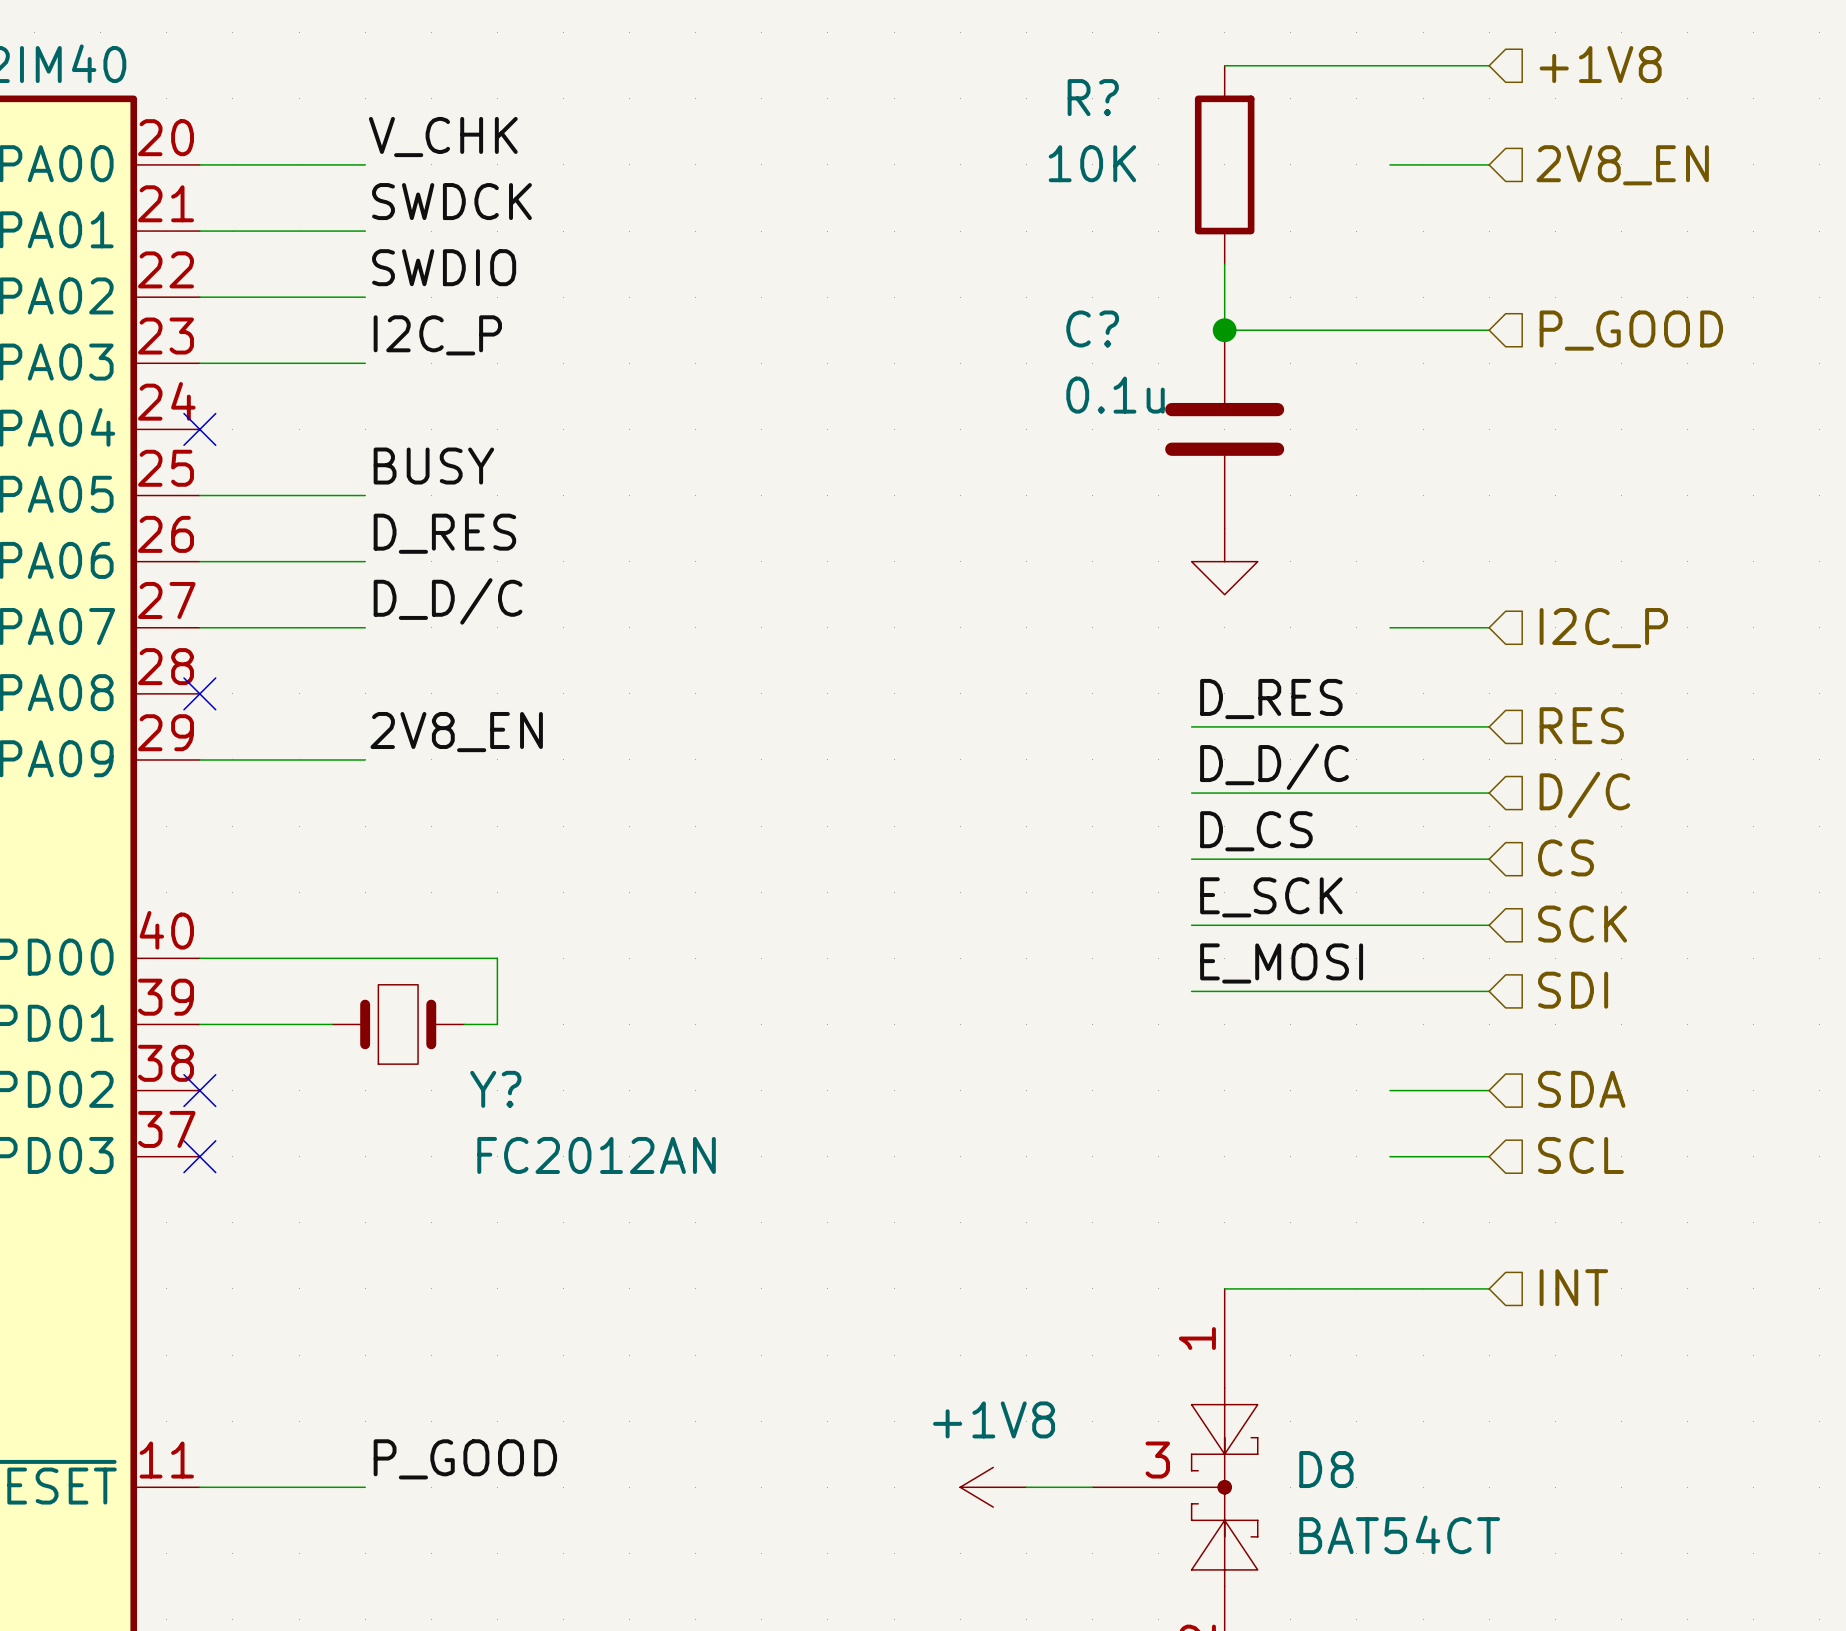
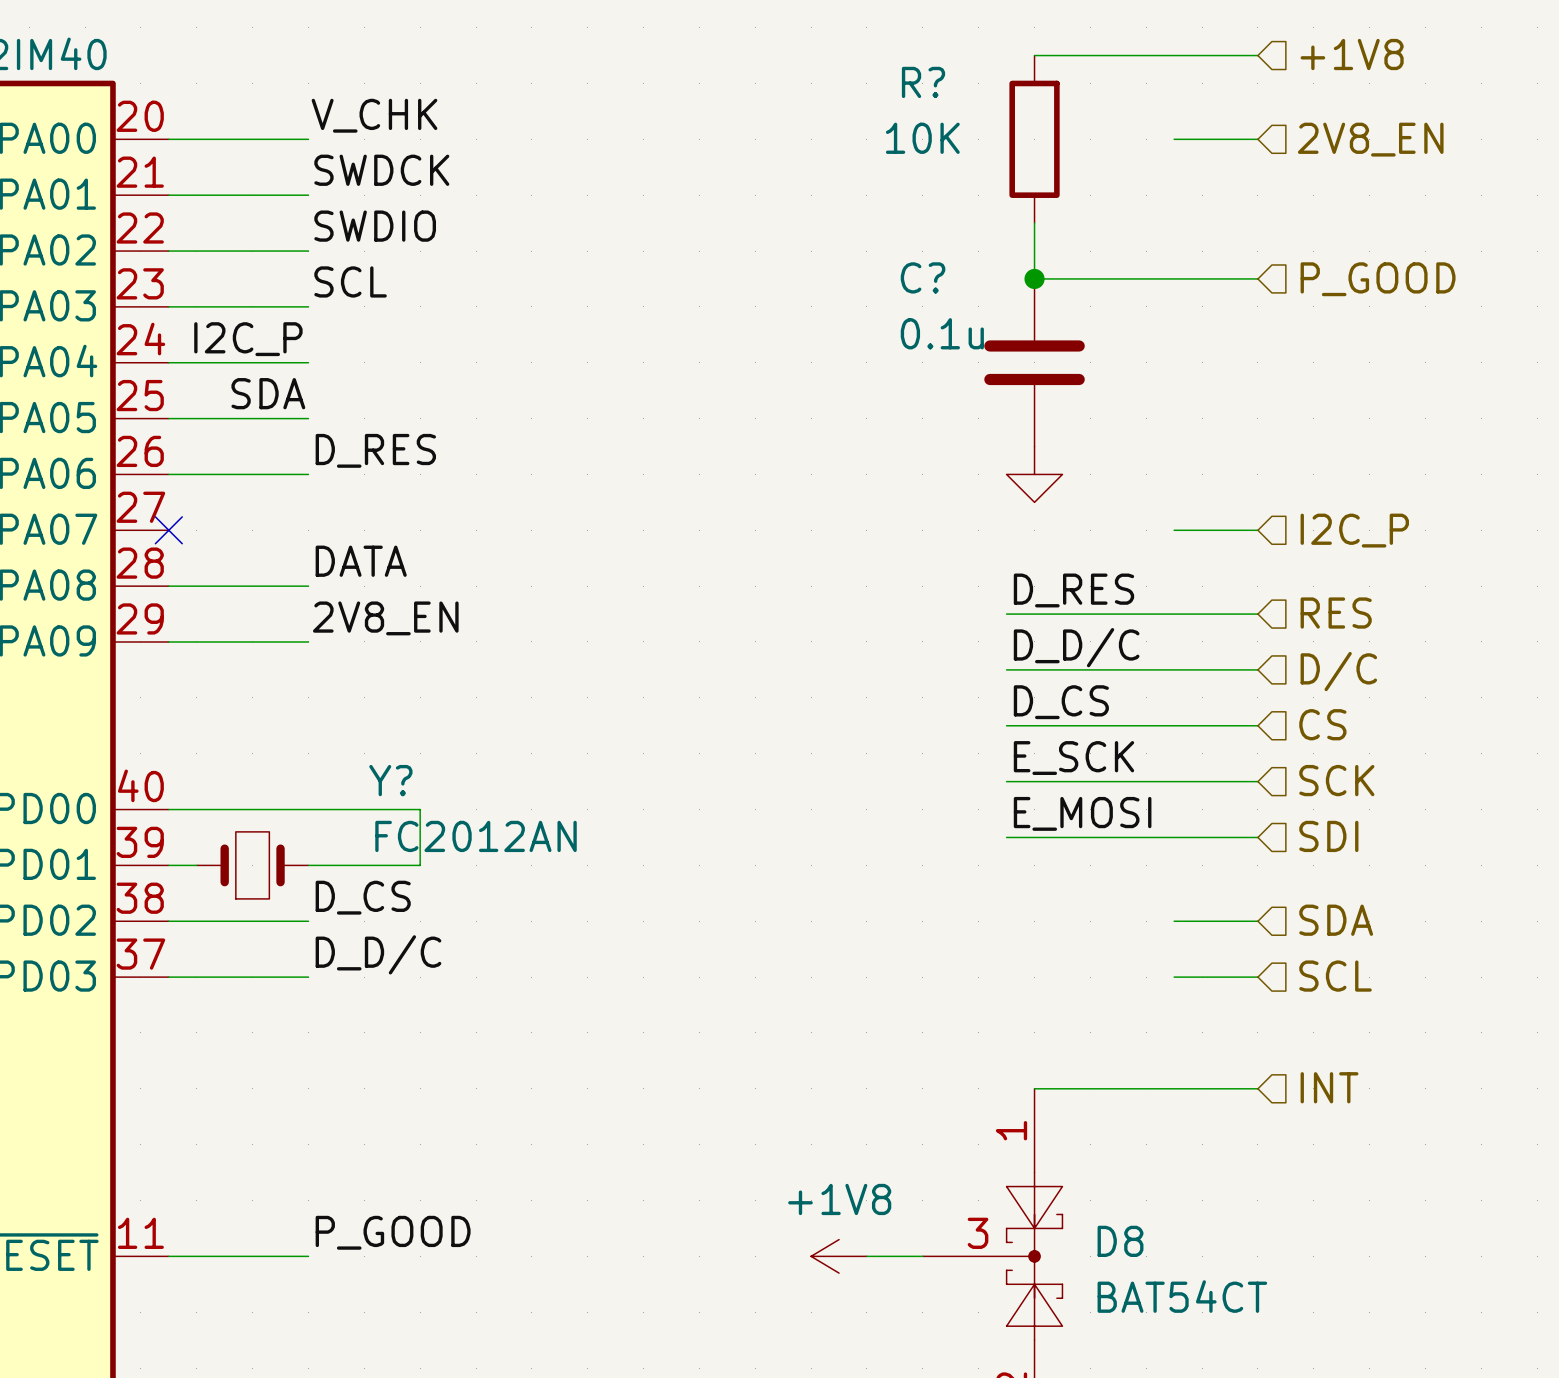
label: I2C_P (437, 335) -> SCL (350, 281)
label: none -> I2C_P (248, 339)
wire: none -> (168, 362) (308, 362)
no-connect mark: (199, 429) -> none
label: BUSY (433, 466) -> SDA (268, 393)
label position: D_D/C (448, 601) -> D_D/C (378, 954)
wire: (199, 627) (365, 627) -> (168, 586) (308, 586)
label: none -> DATA (361, 561)
no-connect mark position: (199, 693) -> (168, 530)
wire: (232, 1024) (332, 1024) -> (308, 865) (392, 865)
Y? position: (398, 1024) -> (252, 865)
label: none -> D_CS (363, 897)
Y? name position: Y? (495, 1089) -> Y? (390, 780)
wire: none -> (168, 921) (308, 921)
no-connect mark: (199, 1090) -> none
Y? value position: FC2012AN (596, 1155) -> FC2012AN (476, 836)
wire: none -> (168, 977) (308, 977)
no-connect mark: (199, 1156) -> none

